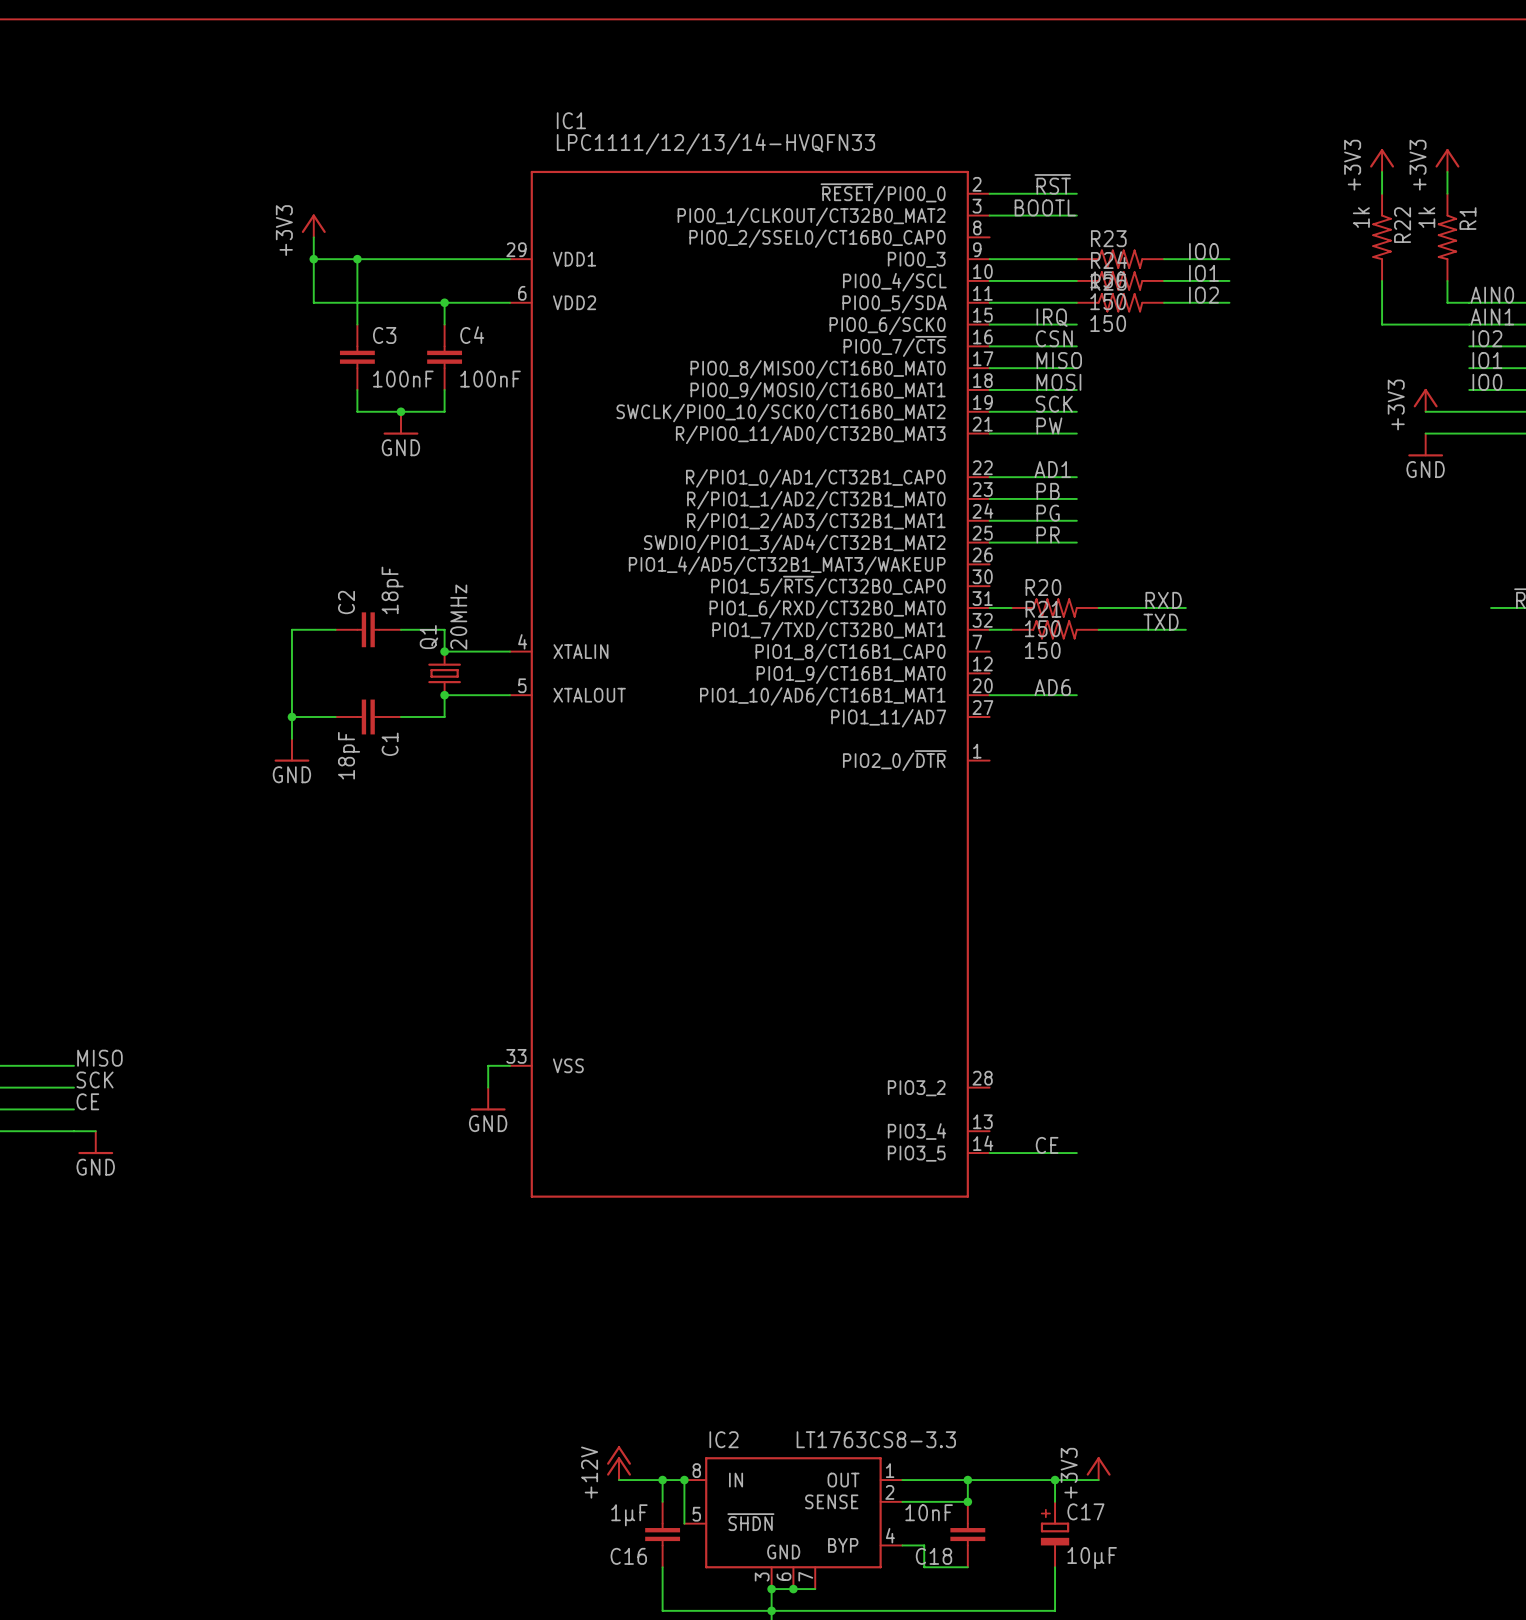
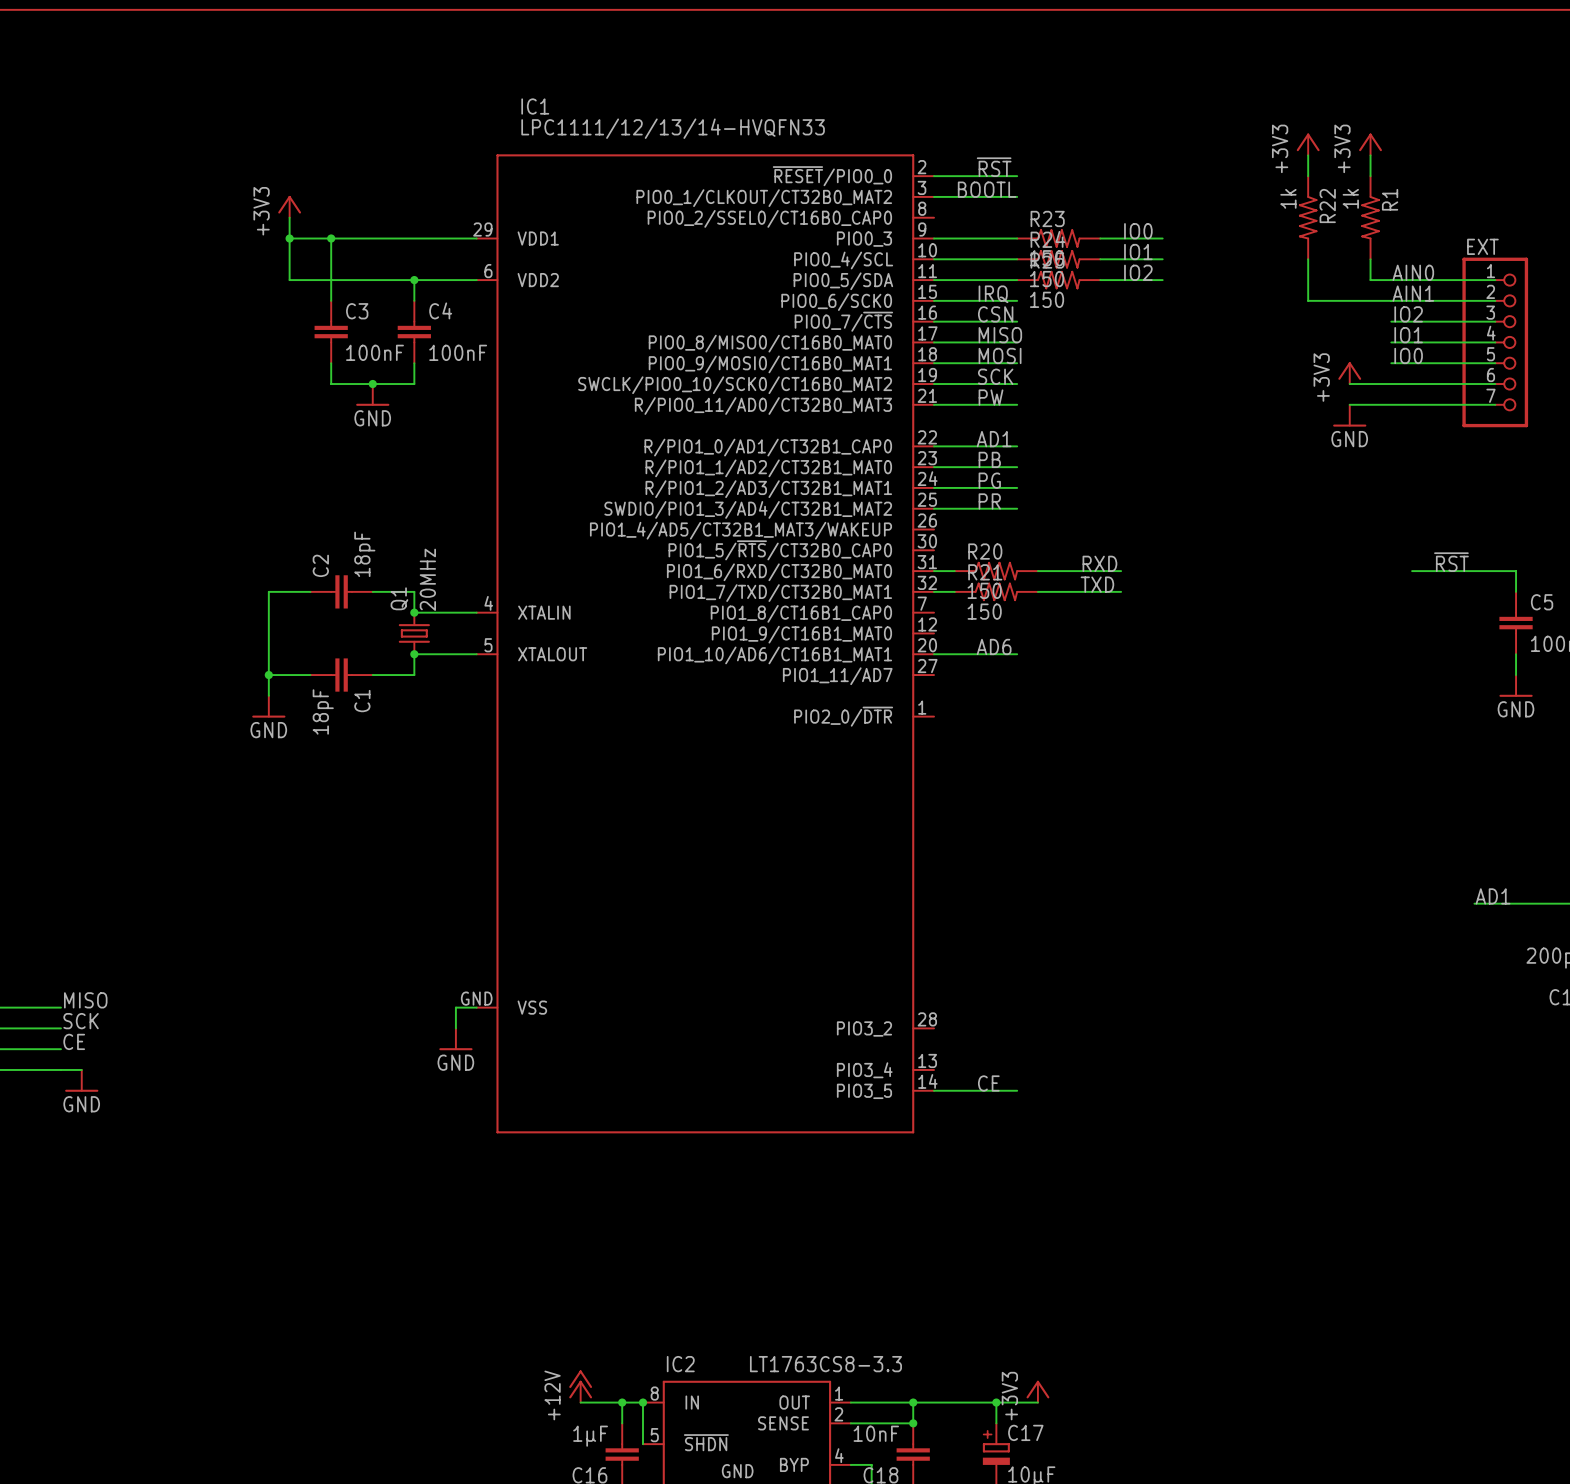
IC1 pin number: 33 (516, 1056) -> GND (476, 998)

